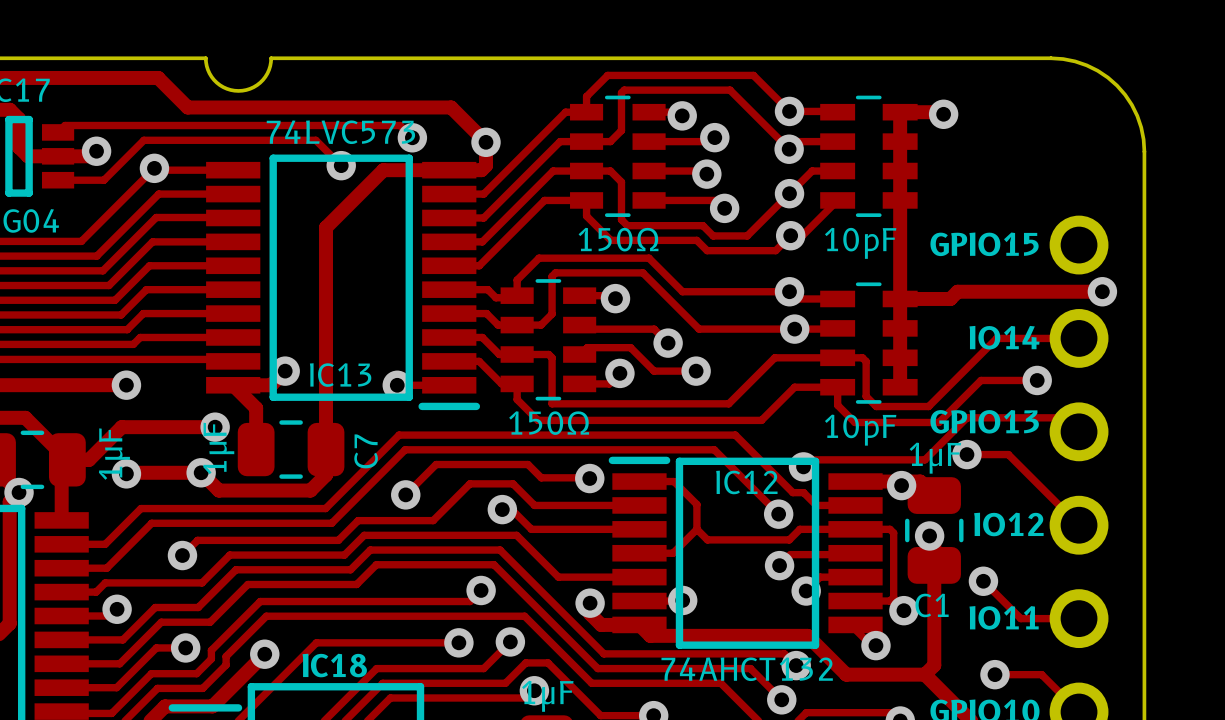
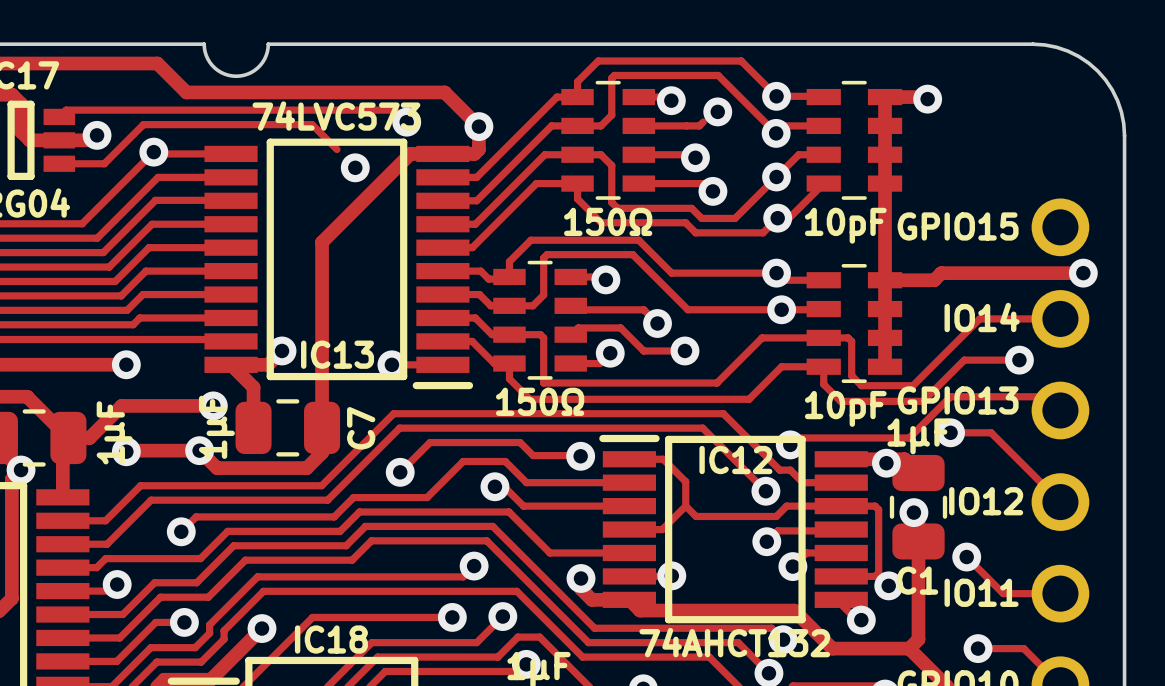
via position: (714, 137) -> (717, 111)
via position: (341, 165) -> (355, 167)
track: (416, 170) (383, 170) (326, 227) (326, 260) -> (410, 153) (322, 242)

